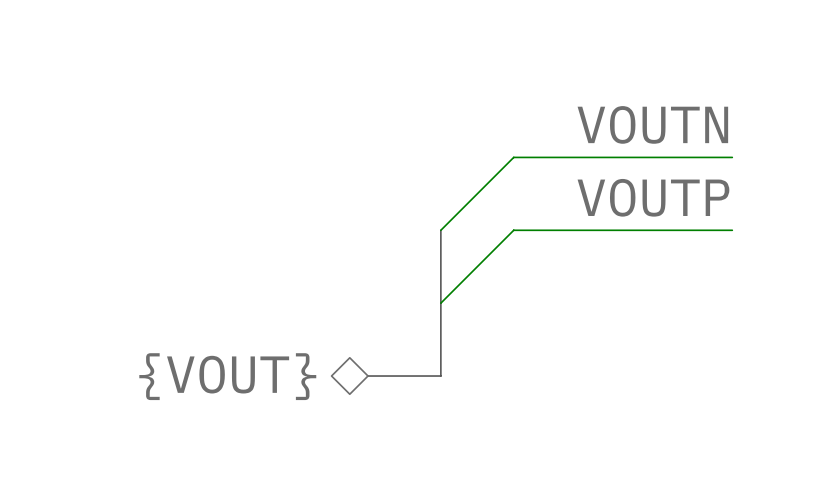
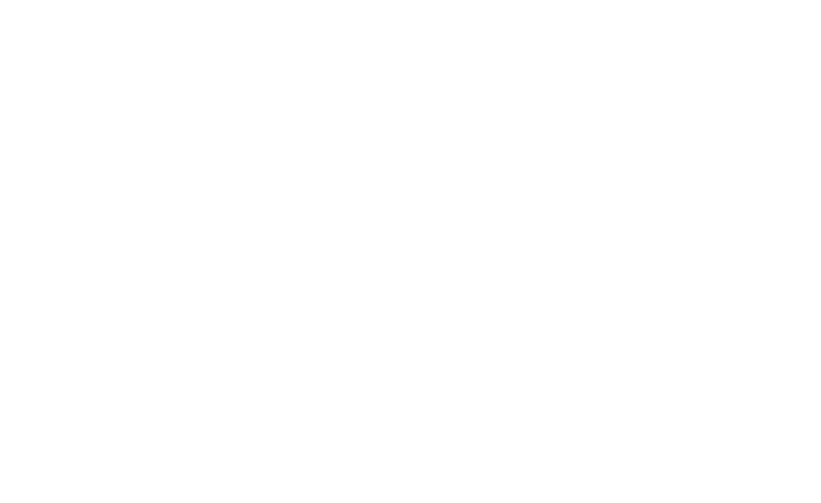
label: VOUTN (652, 124) -> none
wire: (732, 157) (513, 157) (440, 230) -> none
label: VOUTP (653, 197) -> none
bus: (440, 230) (440, 376) (368, 376) -> none
wire: (732, 230) (513, 230) (440, 303) -> none
hierarchical label: {VOUT} (227, 376) -> none

